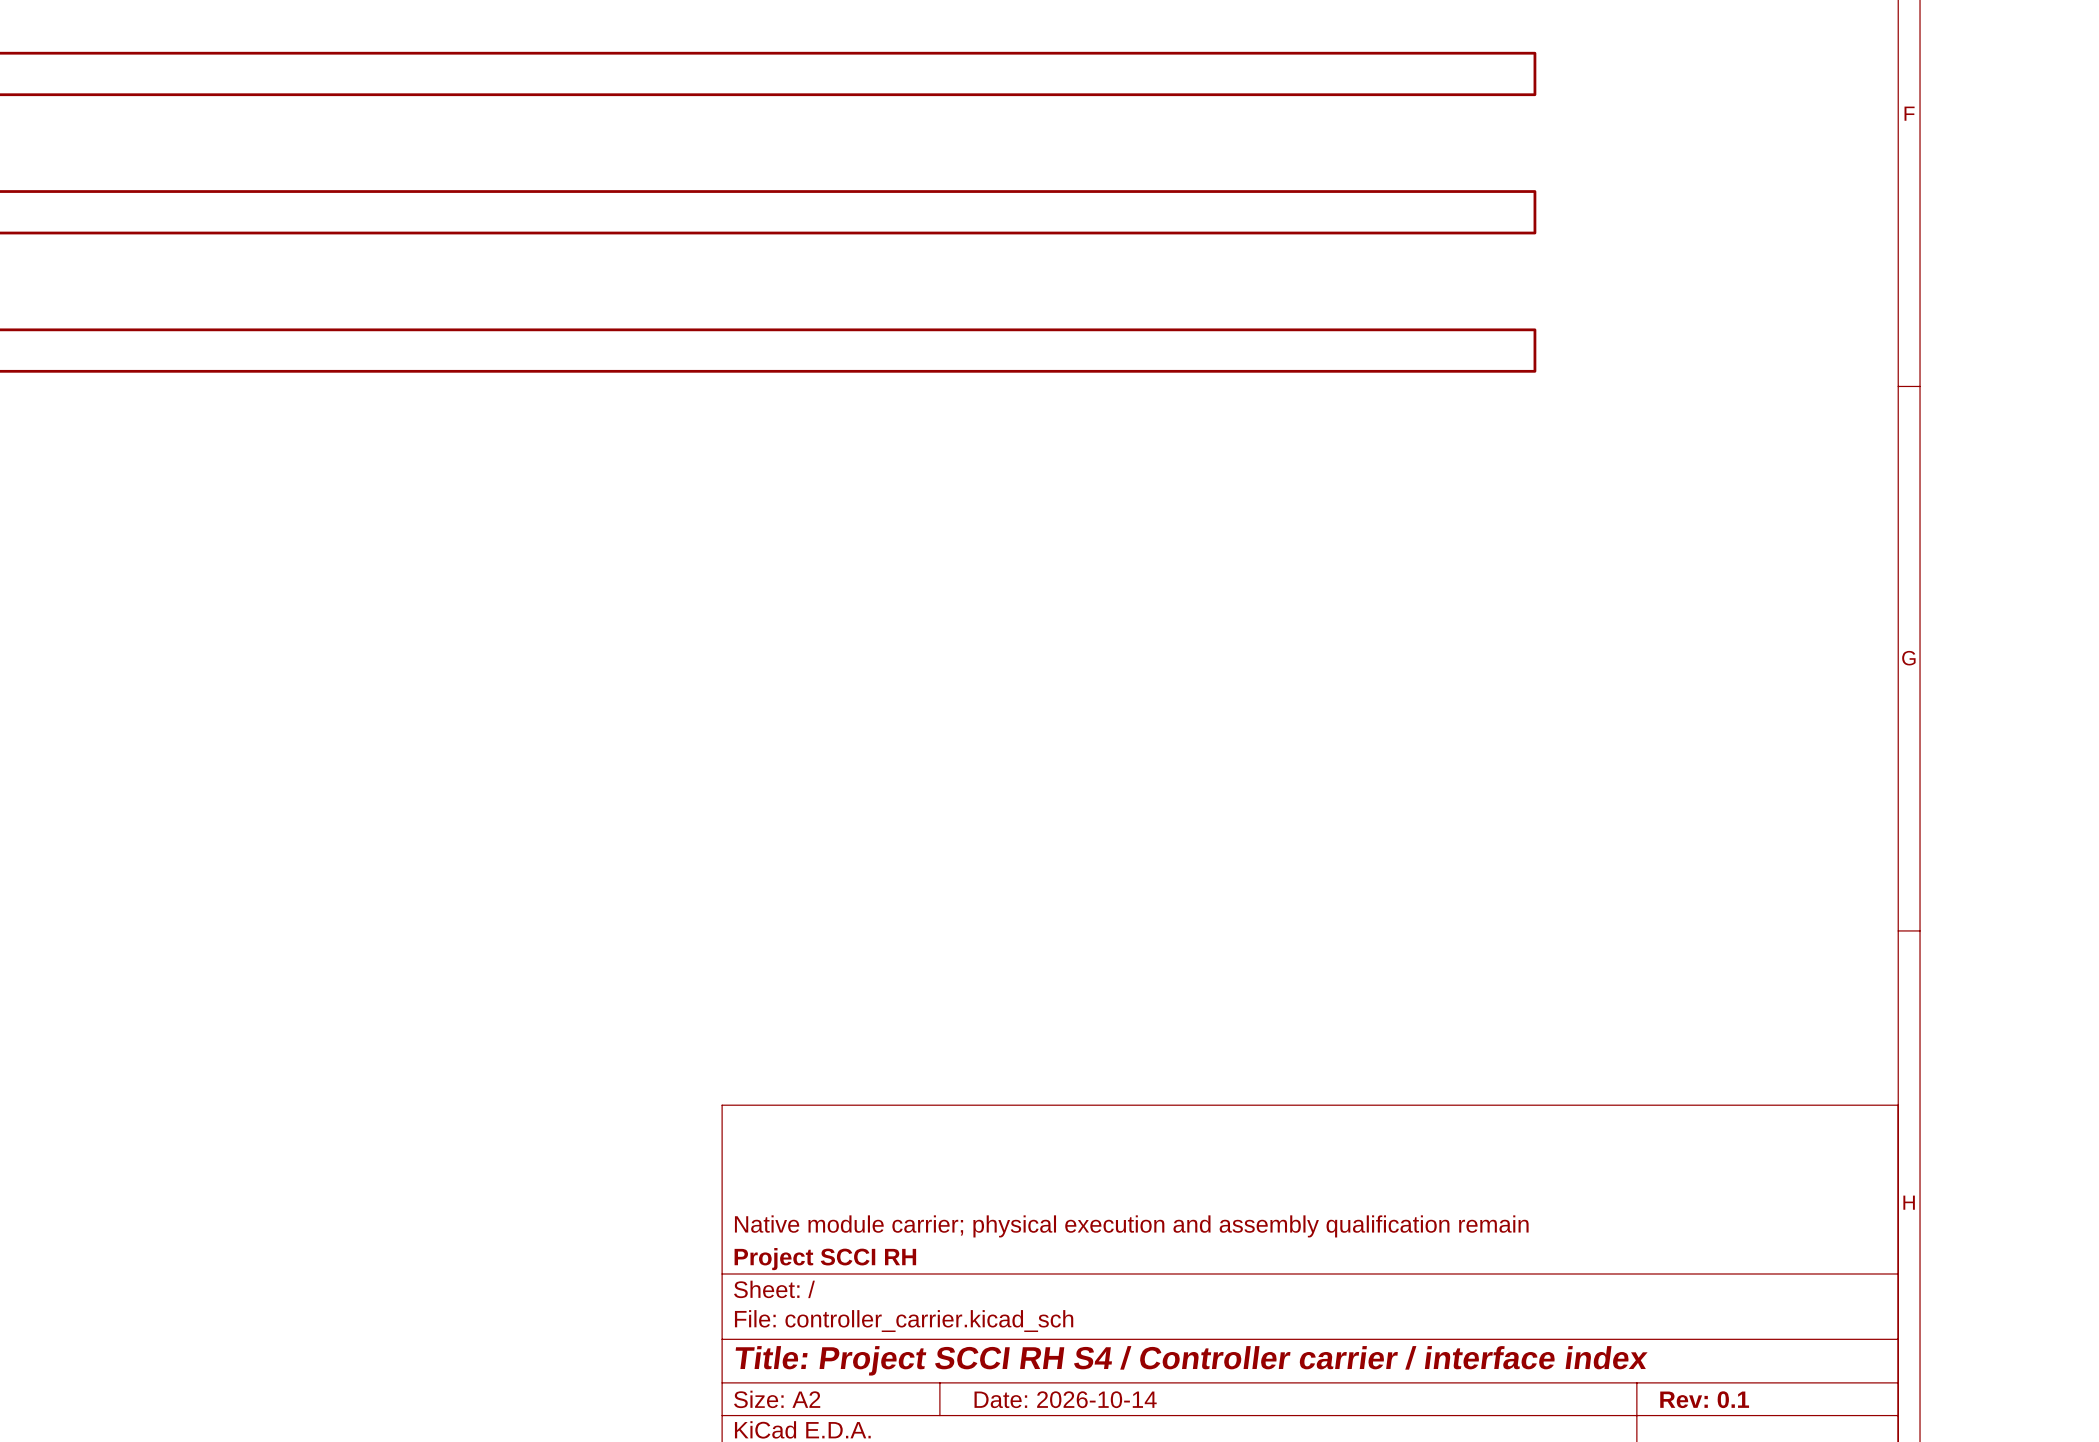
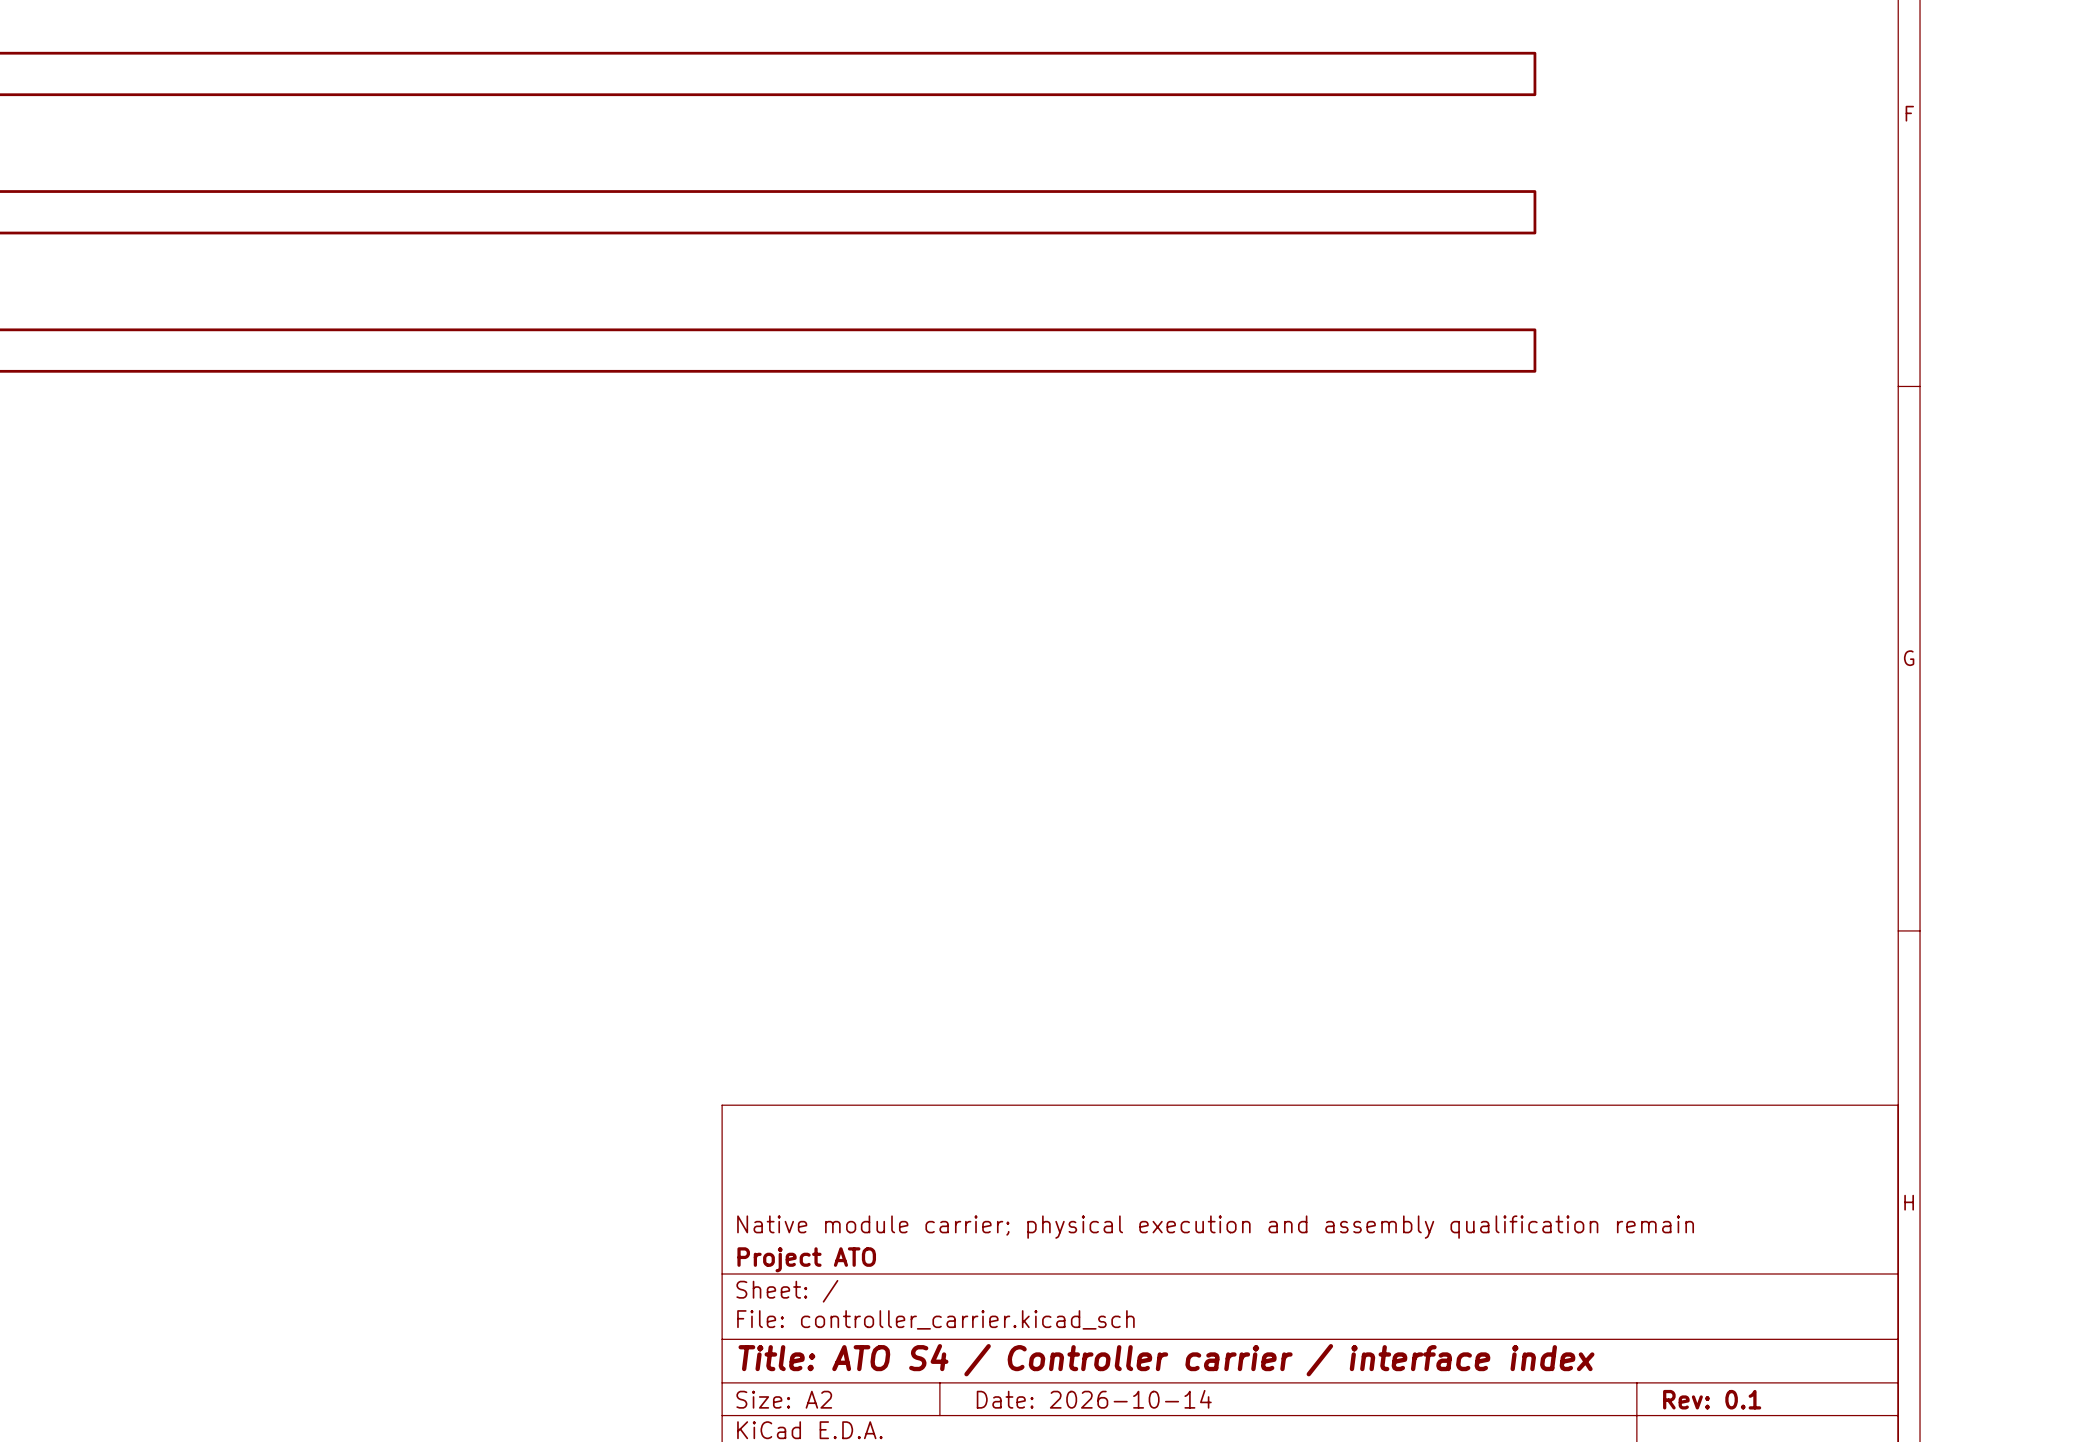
title block: Project SCCI RH (825, 1259) -> Project ATO (806, 1259)
title block: Title: Project SCCI RH S4 / Controller carrier / interface index (1191, 1360) -> Title: ATO S4 / Controller carrier / interface index (1166, 1360)

